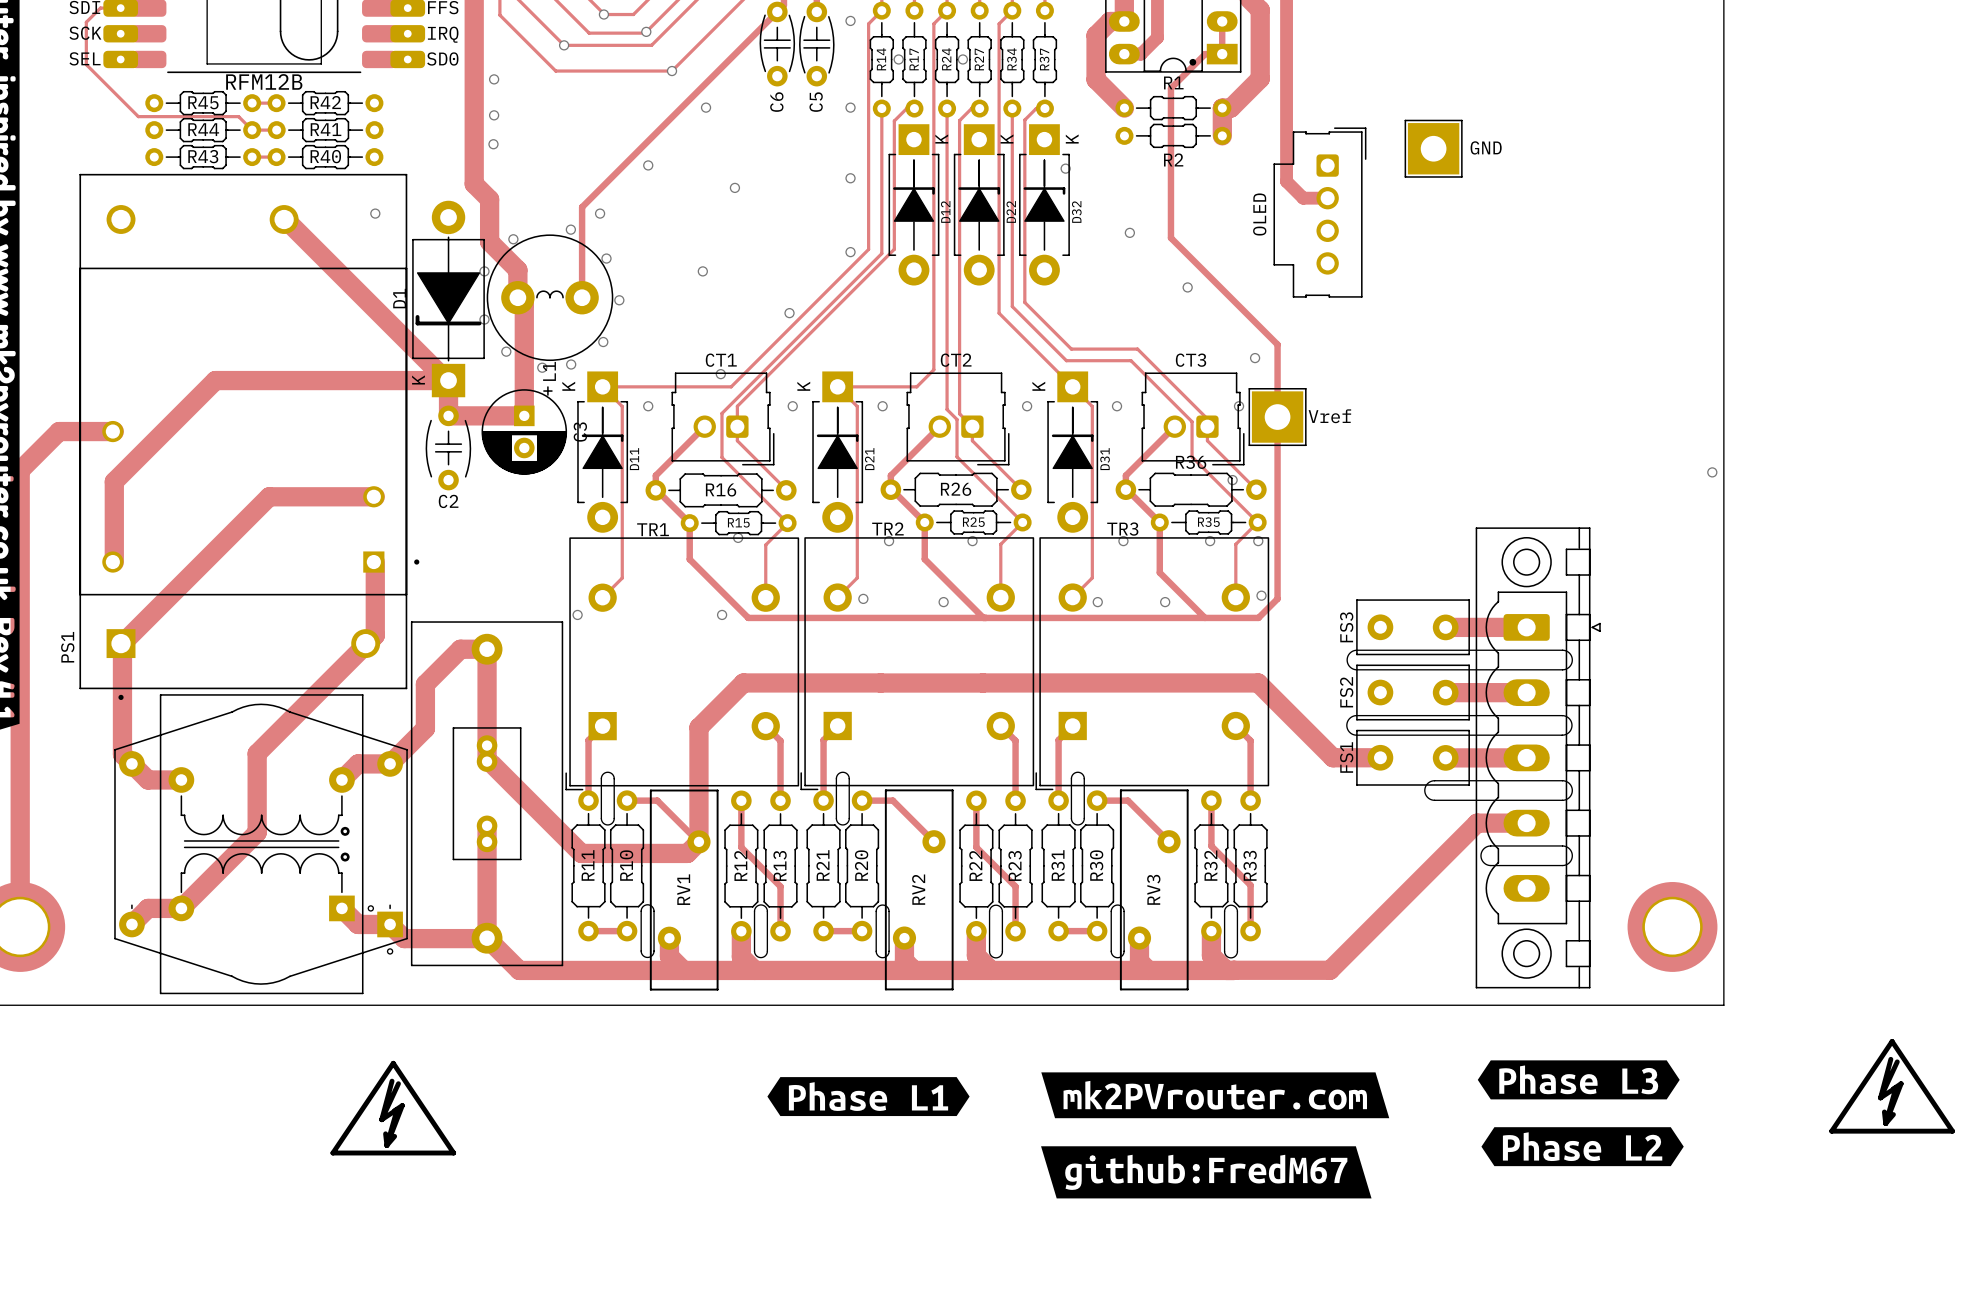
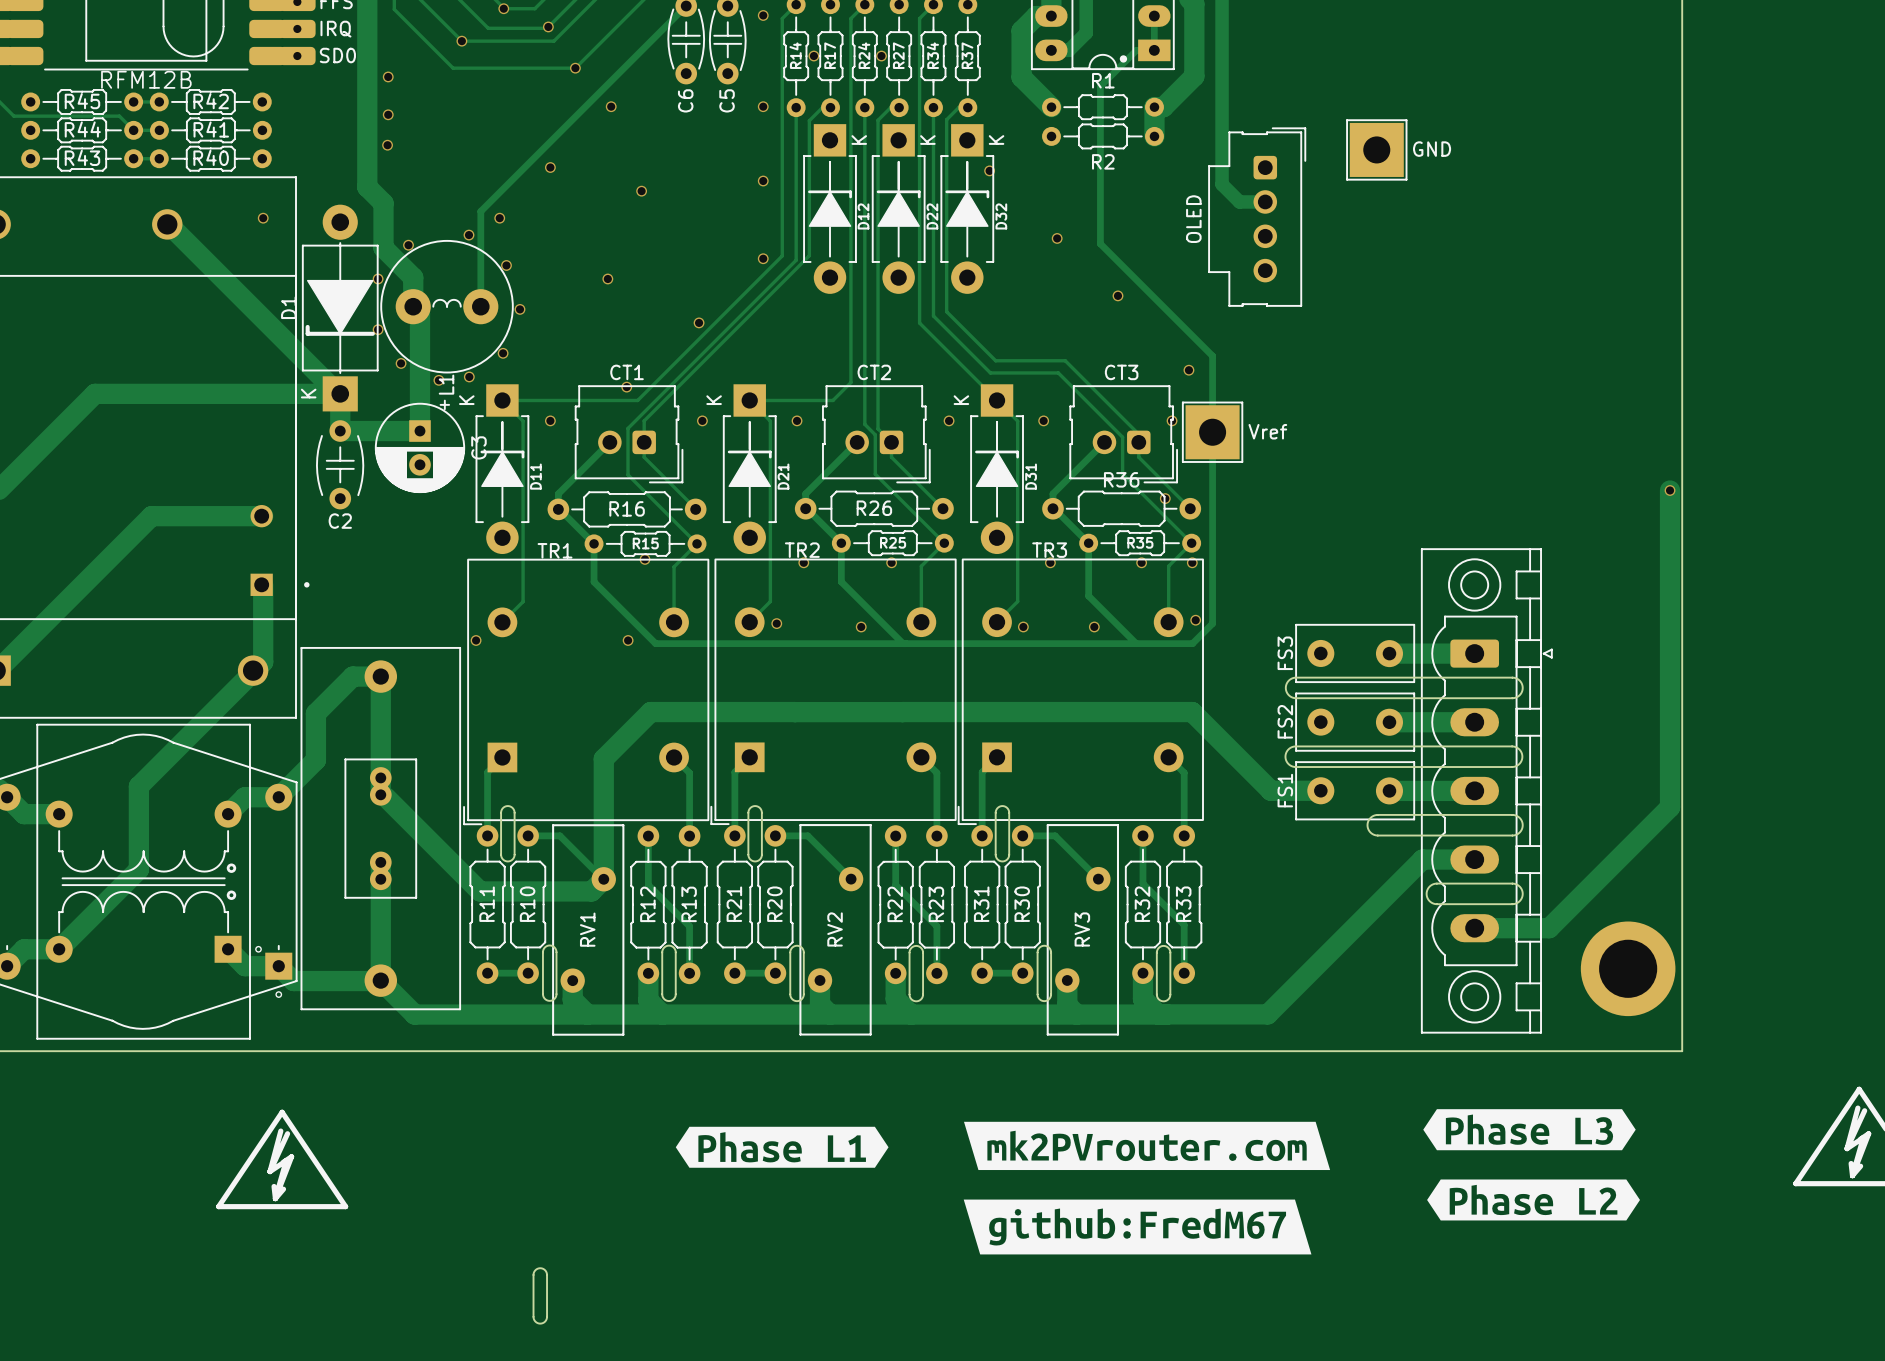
track: none -> (1670, 490) (1670, 807) (1549, 928) (1474, 928)
board edge: none -> (533, 1274) (533, 1317) (536, 1322) (541, 1323) (546, 1317) (546, 1274) (544, 1269) (539, 1268) (535, 1270) (533, 1274)

